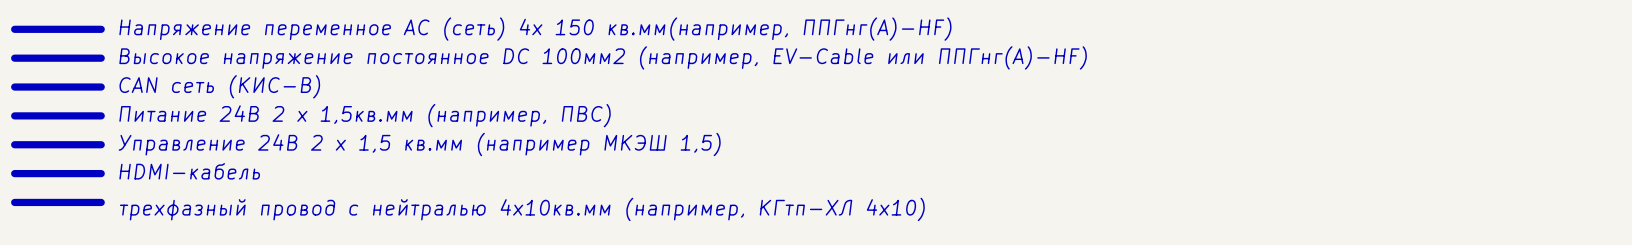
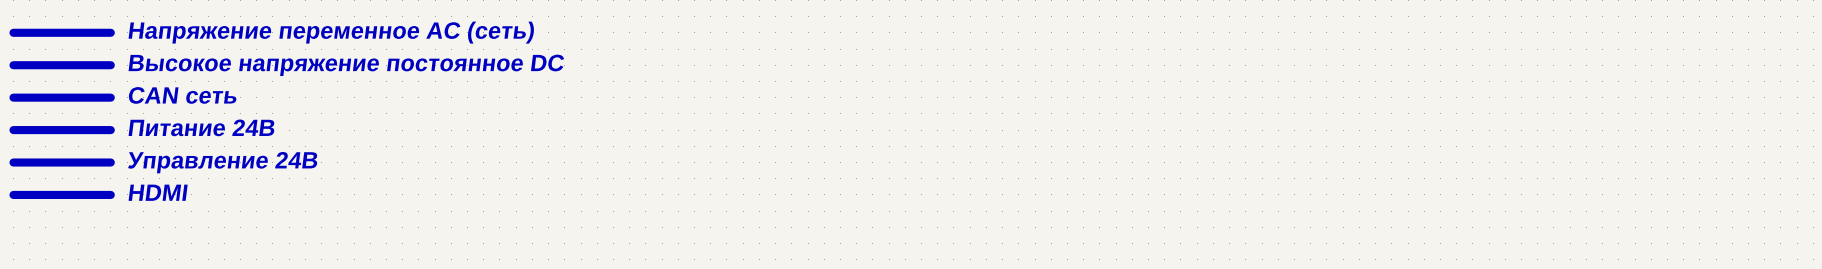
text: Напряжение переменное AC (сеть) 4х 150 кв.мм(например, ППГнг(А)-HF) (535, 29) -> Напряжение переменное AC (сеть) (331, 32)
text: Высокое напряжение постоянное DC 100мм2 (например, EV-Cable или ППГнг(А)-HF) (603, 57) -> Высокое напряжение постоянное DC (346, 65)
text: CAN сеть (КИС-В) (219, 86) -> CAN сеть (182, 95)
text: Питание 24В 2 x 1,5кв.мм (например, ПВС) (365, 115) -> Питание 24В (201, 127)
text: Управление 24В 2 х 1,5 кв.мм (например МКЭШ 1,5) (419, 144) -> Управление 24В (222, 162)
text: HDMI-кабель (189, 171) -> HDMI (158, 192)
line: (14, 202) (101, 202) -> none
text: трехфазный провод с нейтралью 4х10кв.мм (например, КГтп-ХЛ 4х10) (522, 209) -> none

